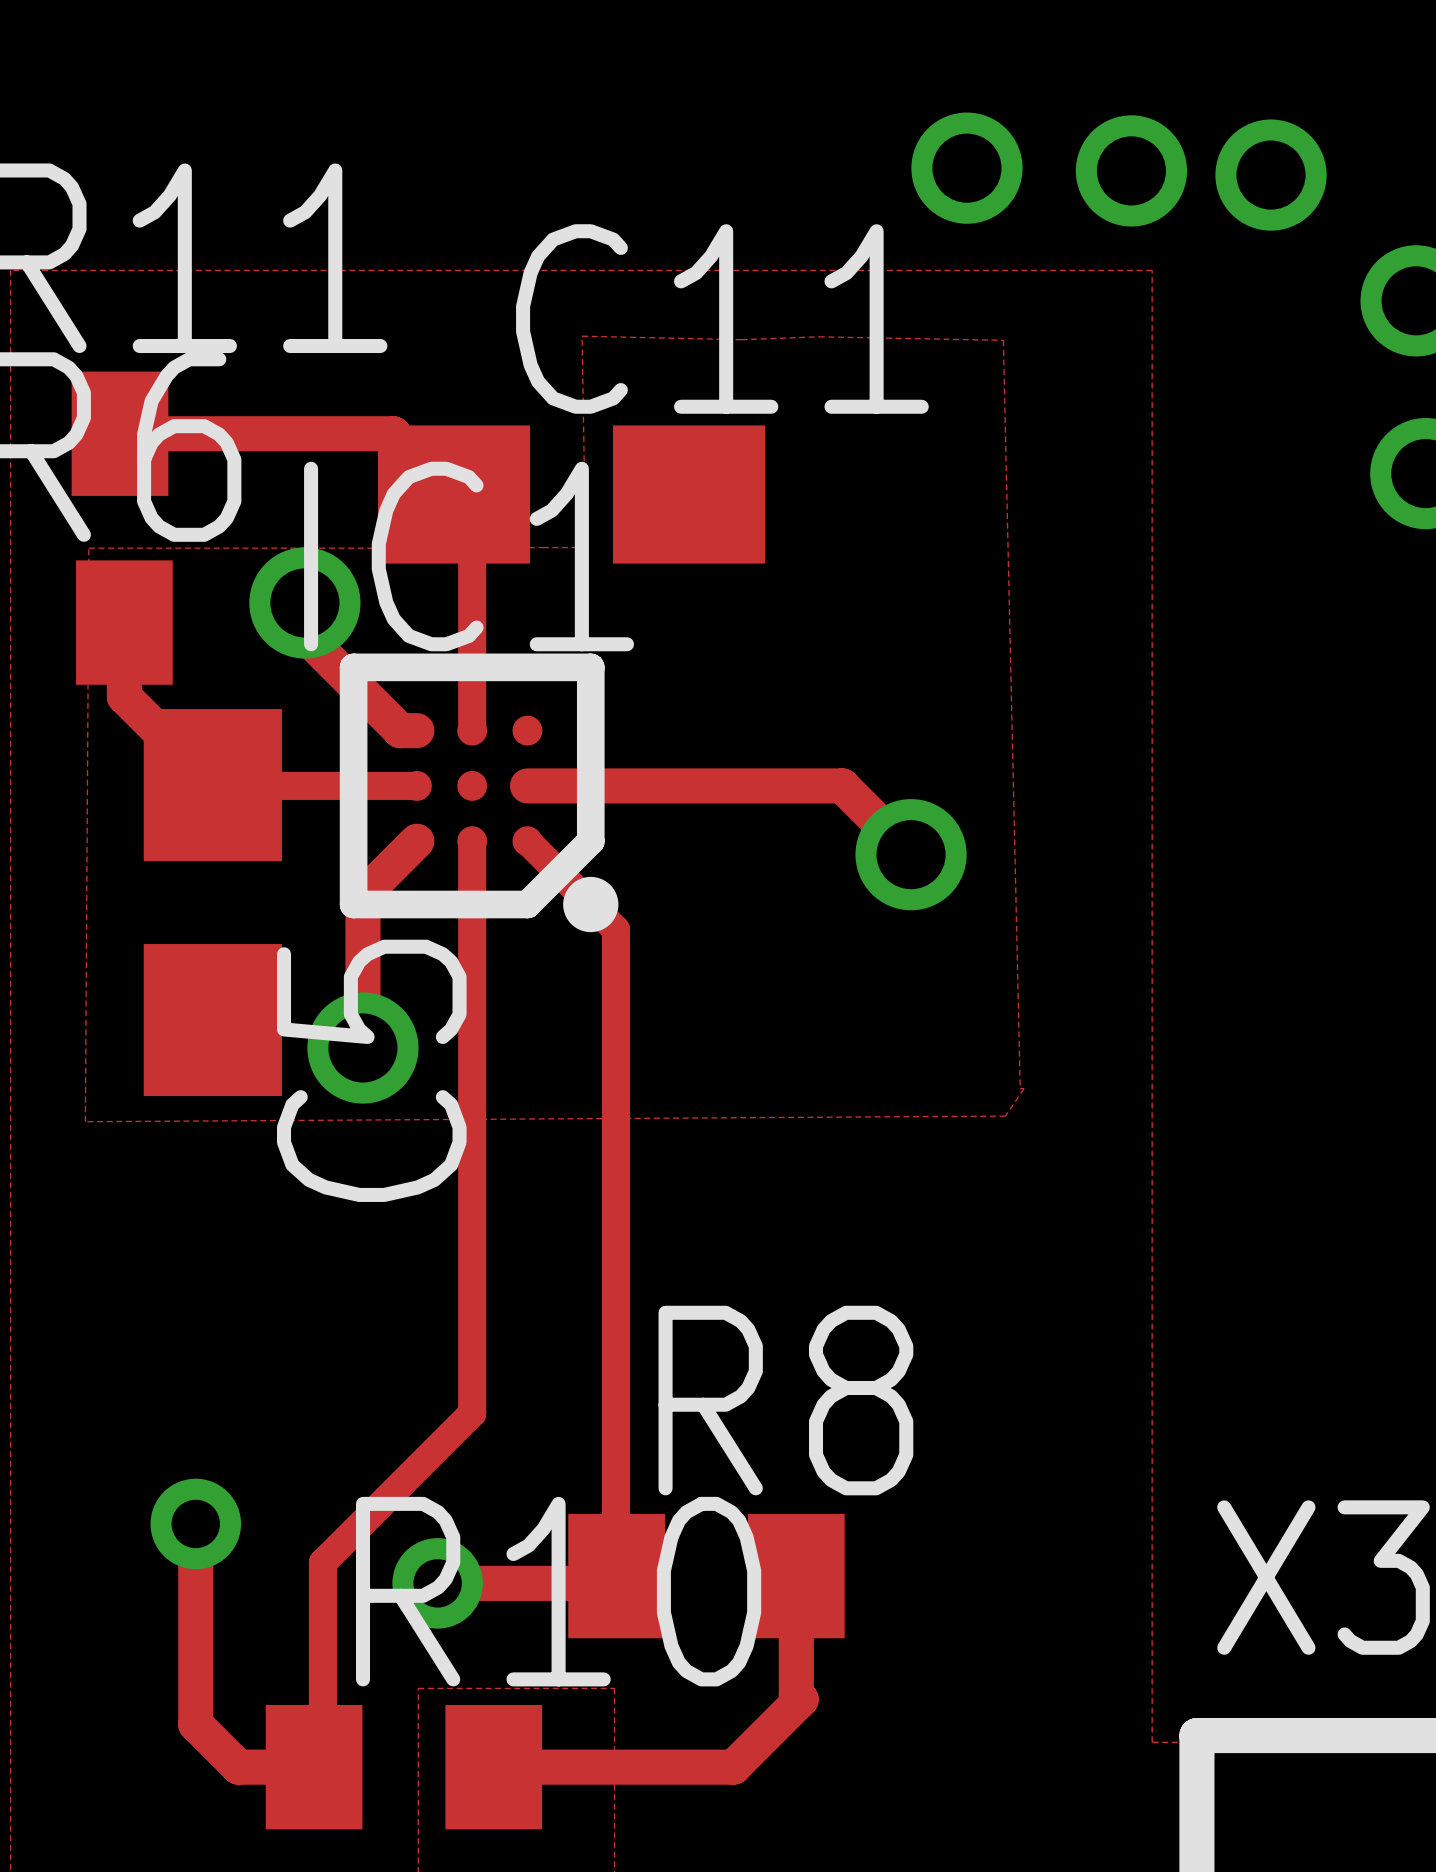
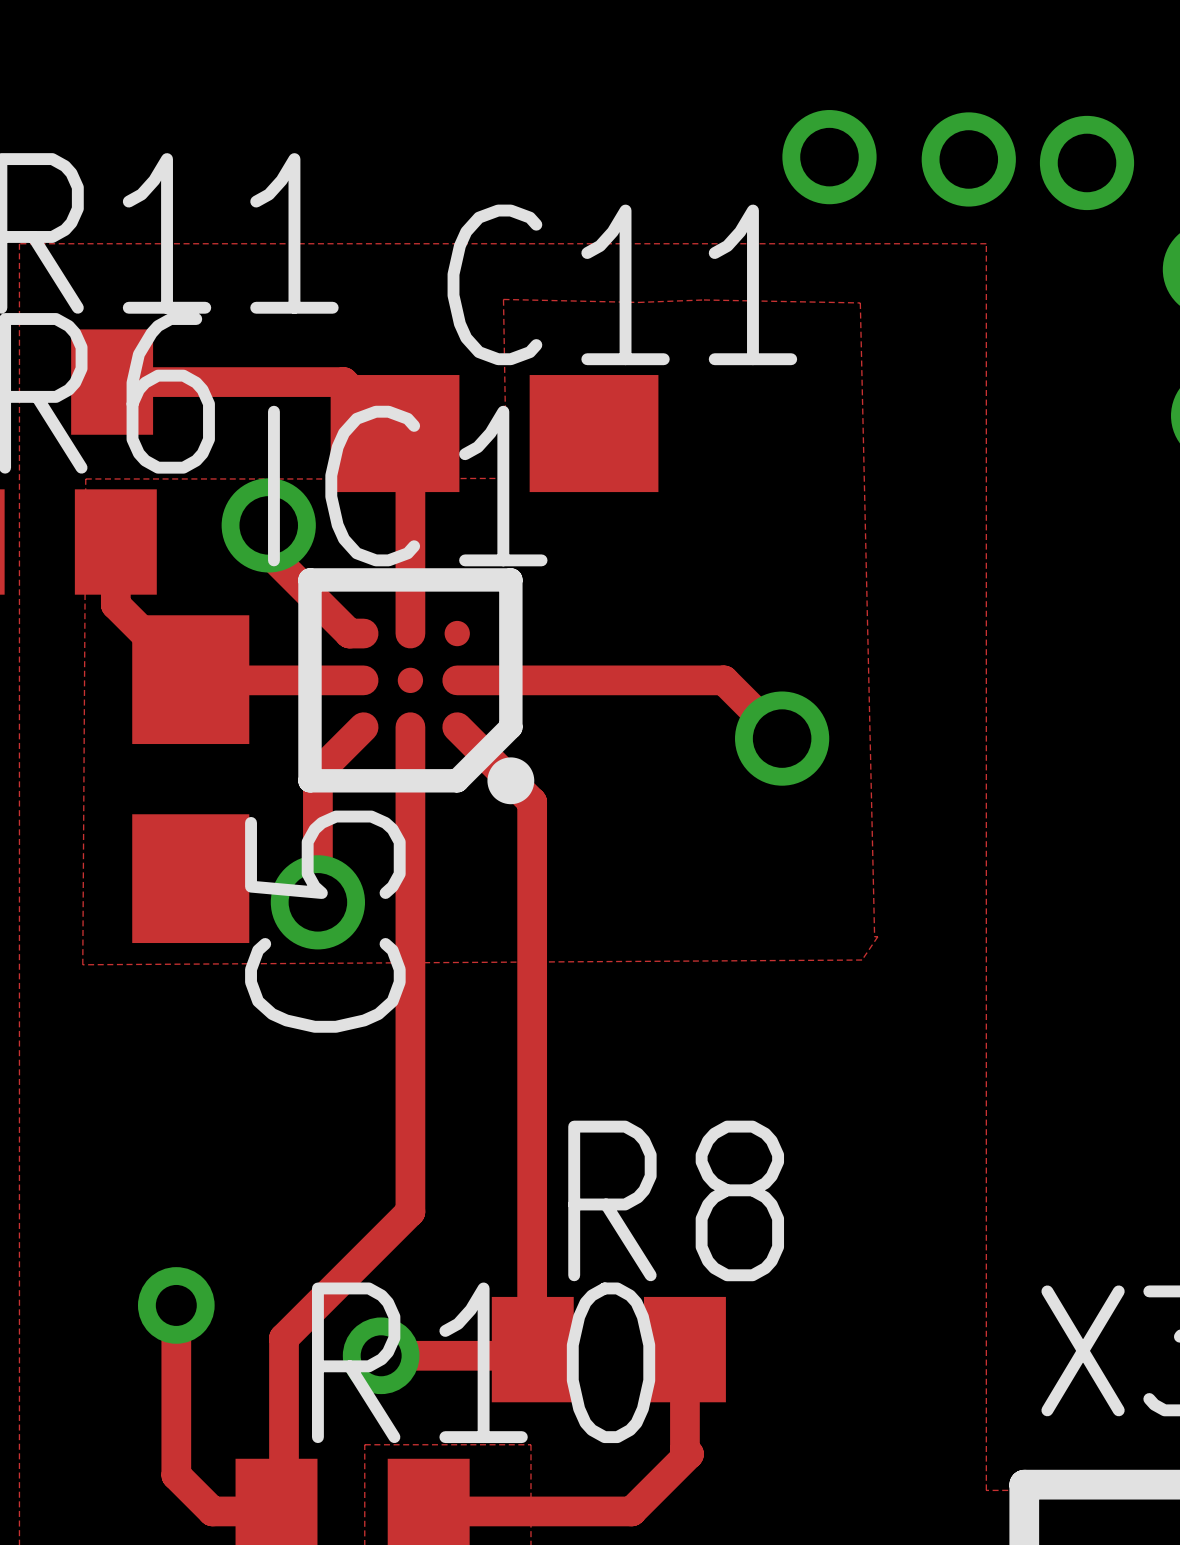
track width: thin (472, 512) (472, 730) -> thick (410, 448) (410, 633)
track width: thin (213, 785) (416, 785) -> thick (191, 680) (363, 680)
track width: thin (472, 841) (472, 1413) (322, 1562) (322, 1758) -> thick (410, 727) (410, 1211) (284, 1338) (284, 1503)
track width: thin (527, 841) (615, 929) (615, 1575) -> thick (457, 727) (532, 802) (532, 1348)

